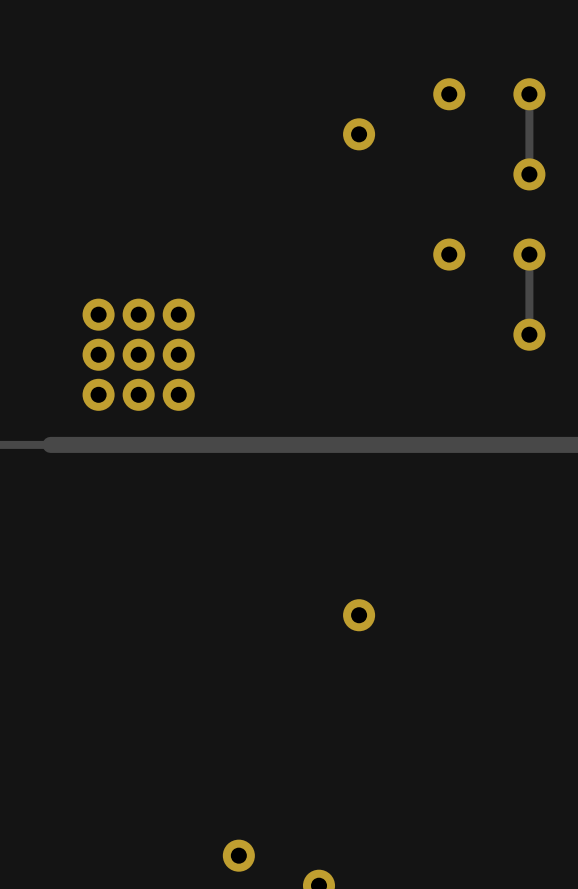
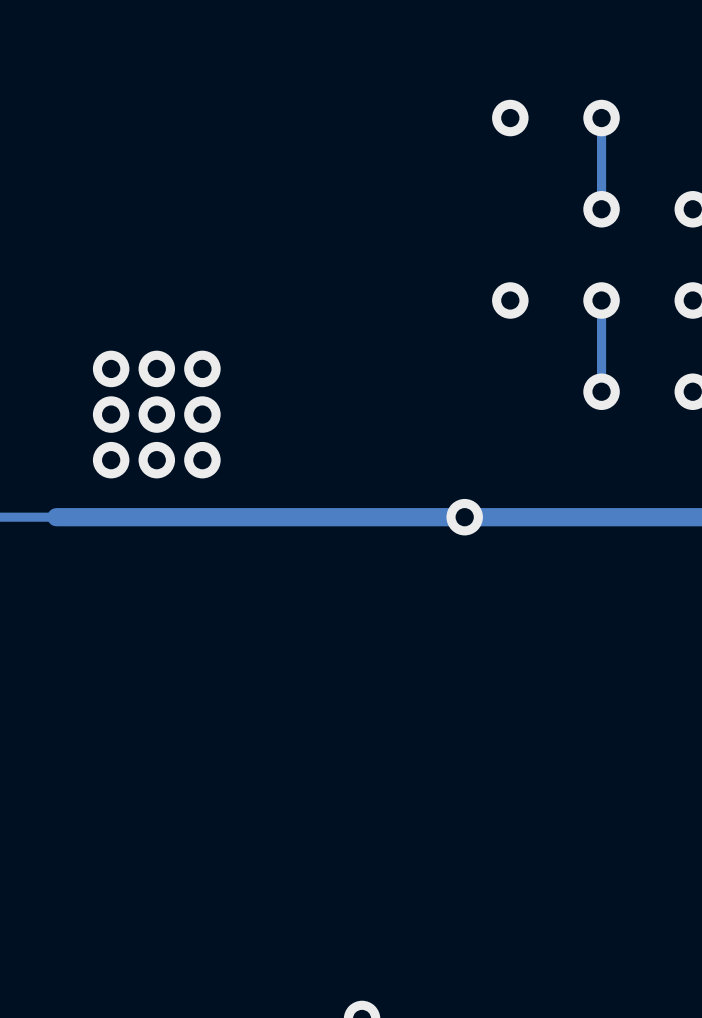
via: (359, 134) -> none
via: none -> (464, 517)
via: (359, 615) -> none
via: (238, 855) -> none

